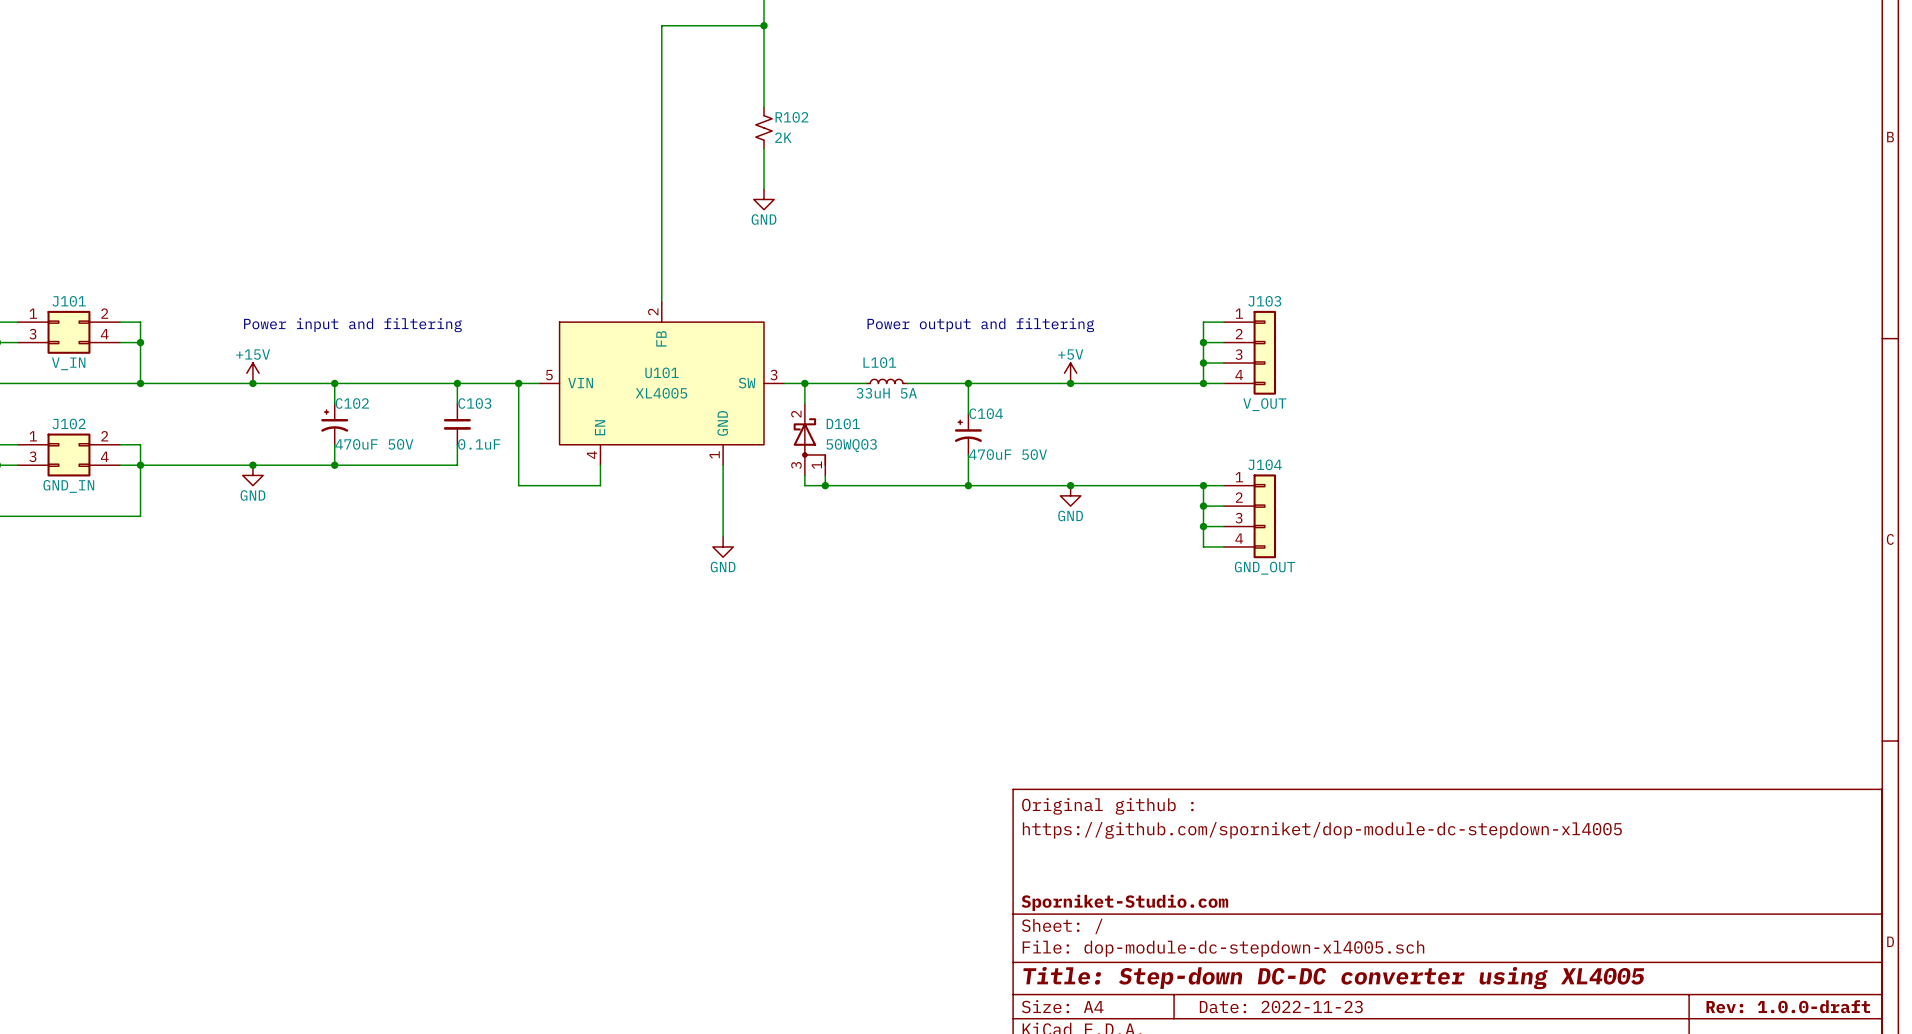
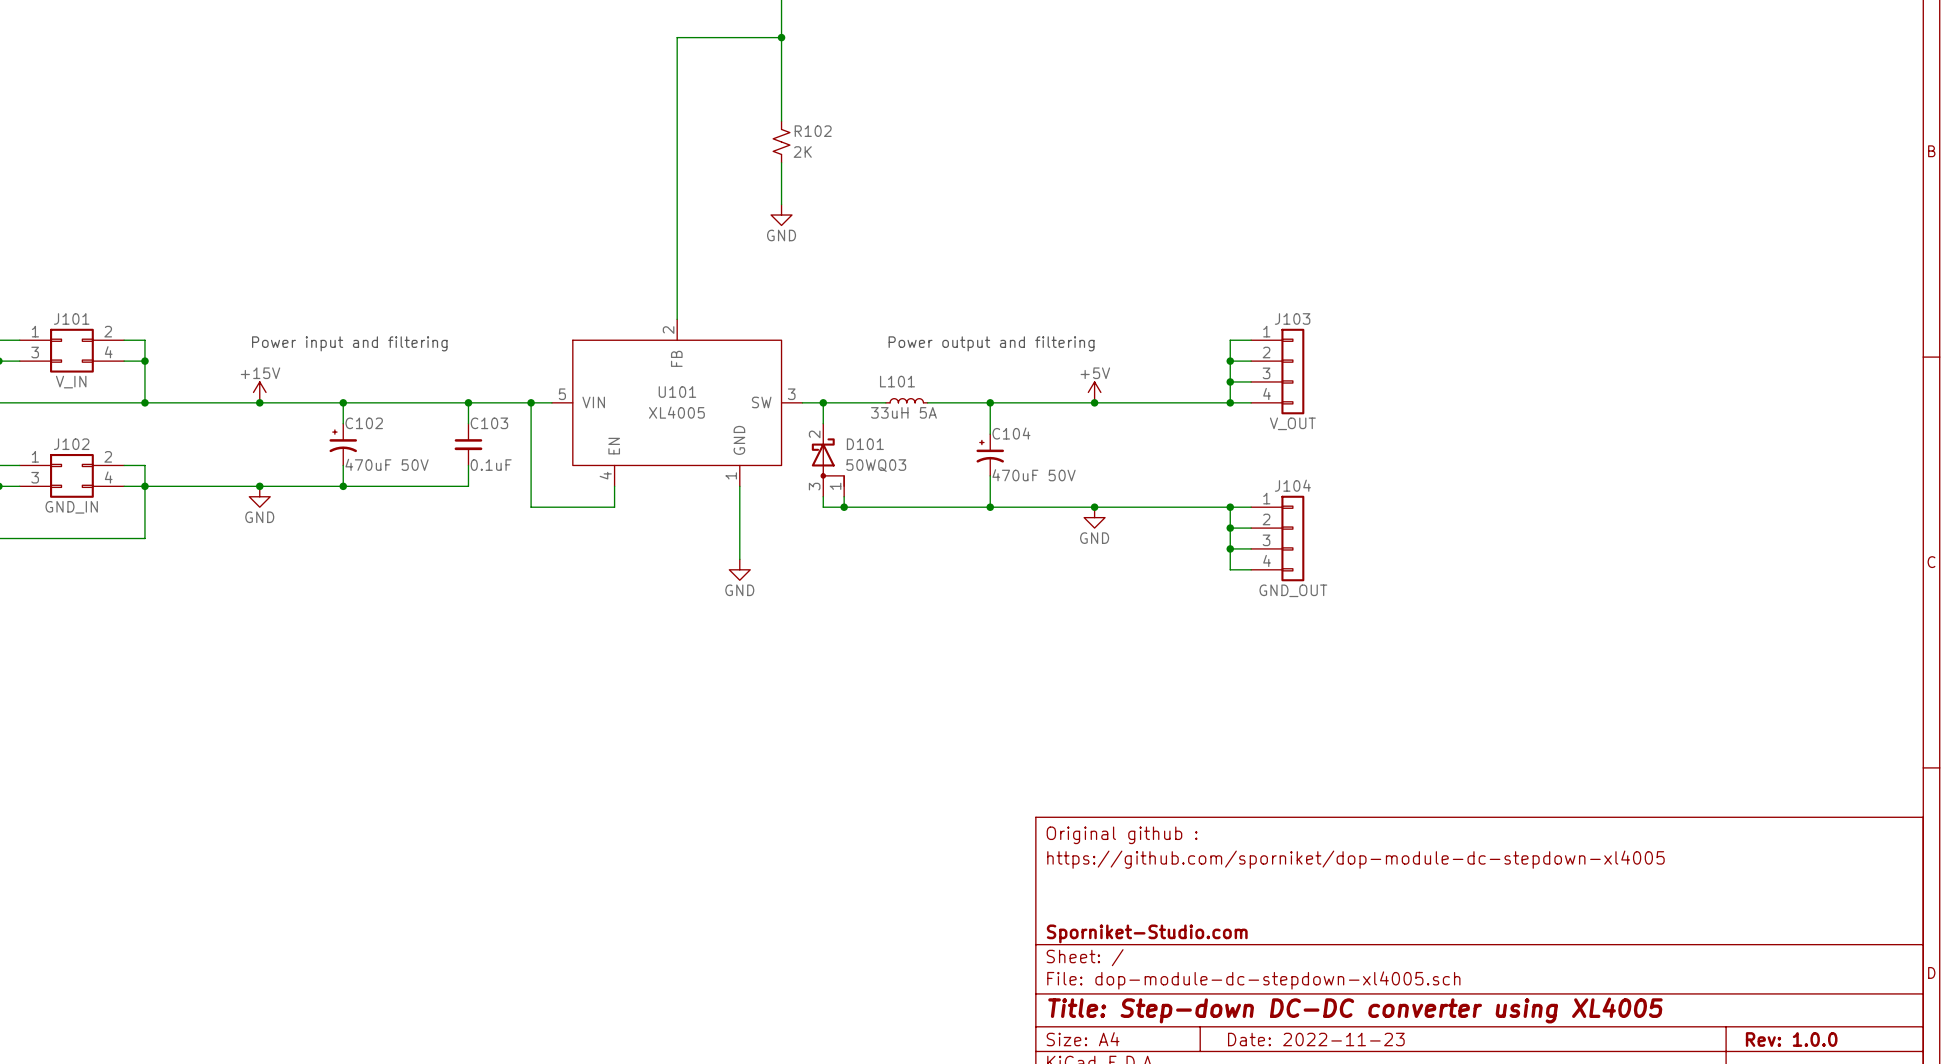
title block: Rev: 1.0.0-draft (1788, 1006) -> Rev: 1.0.0 (1791, 1039)

